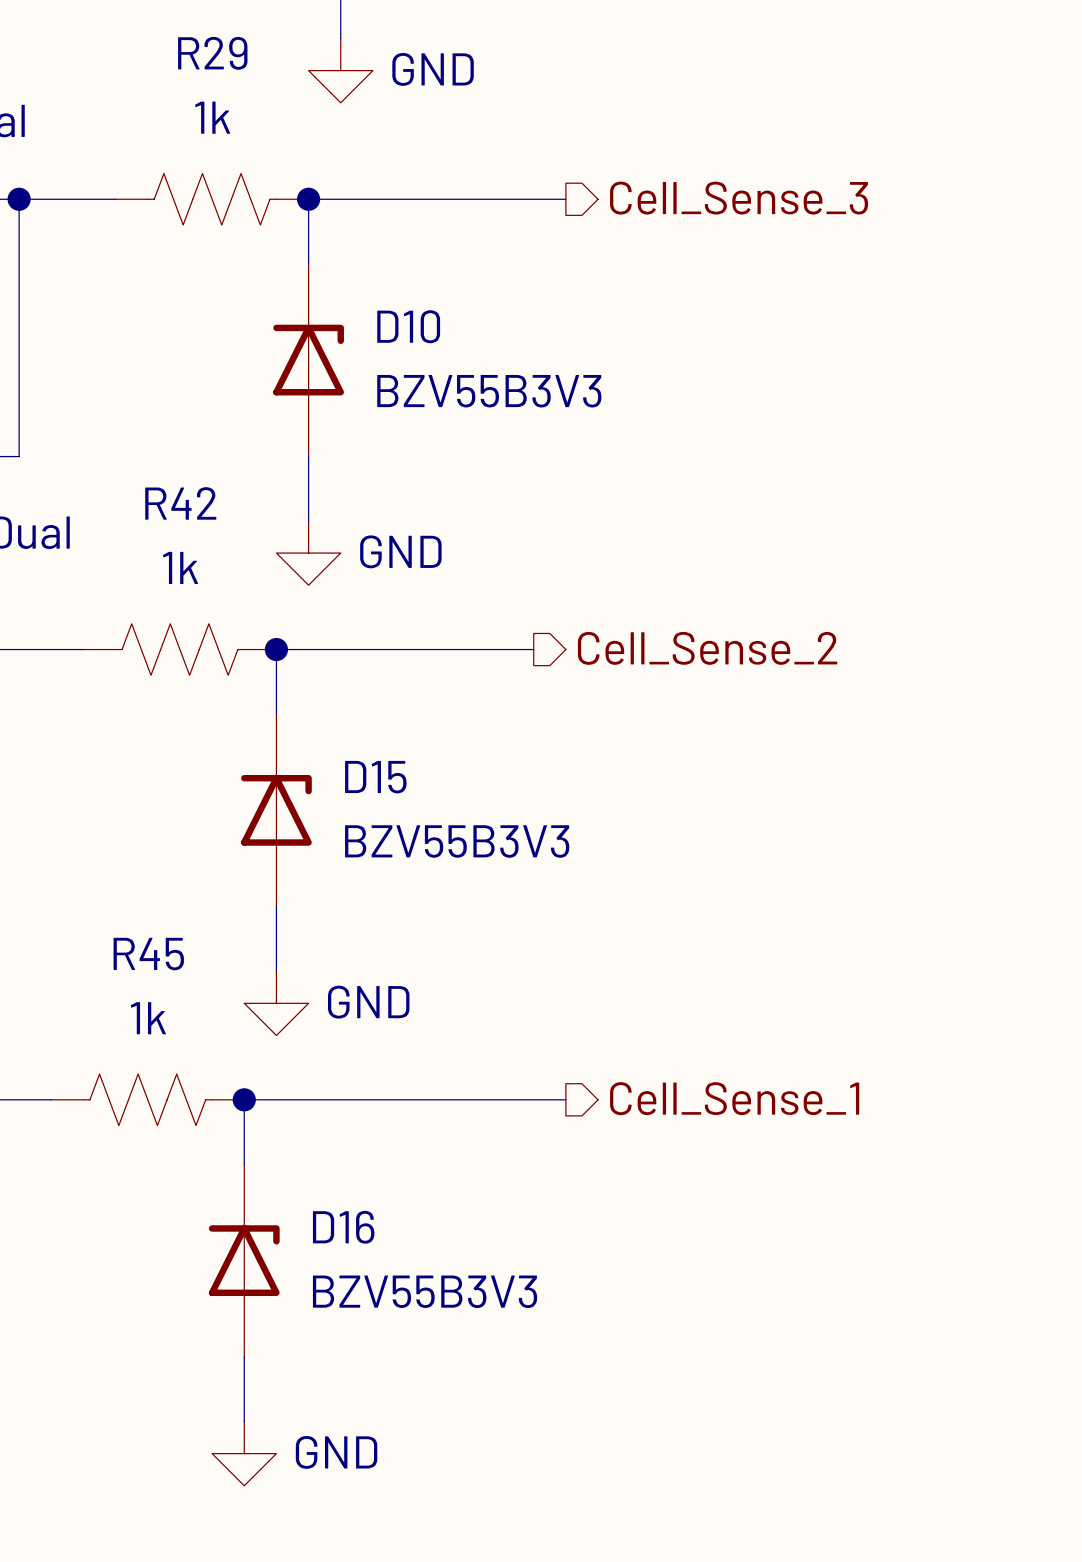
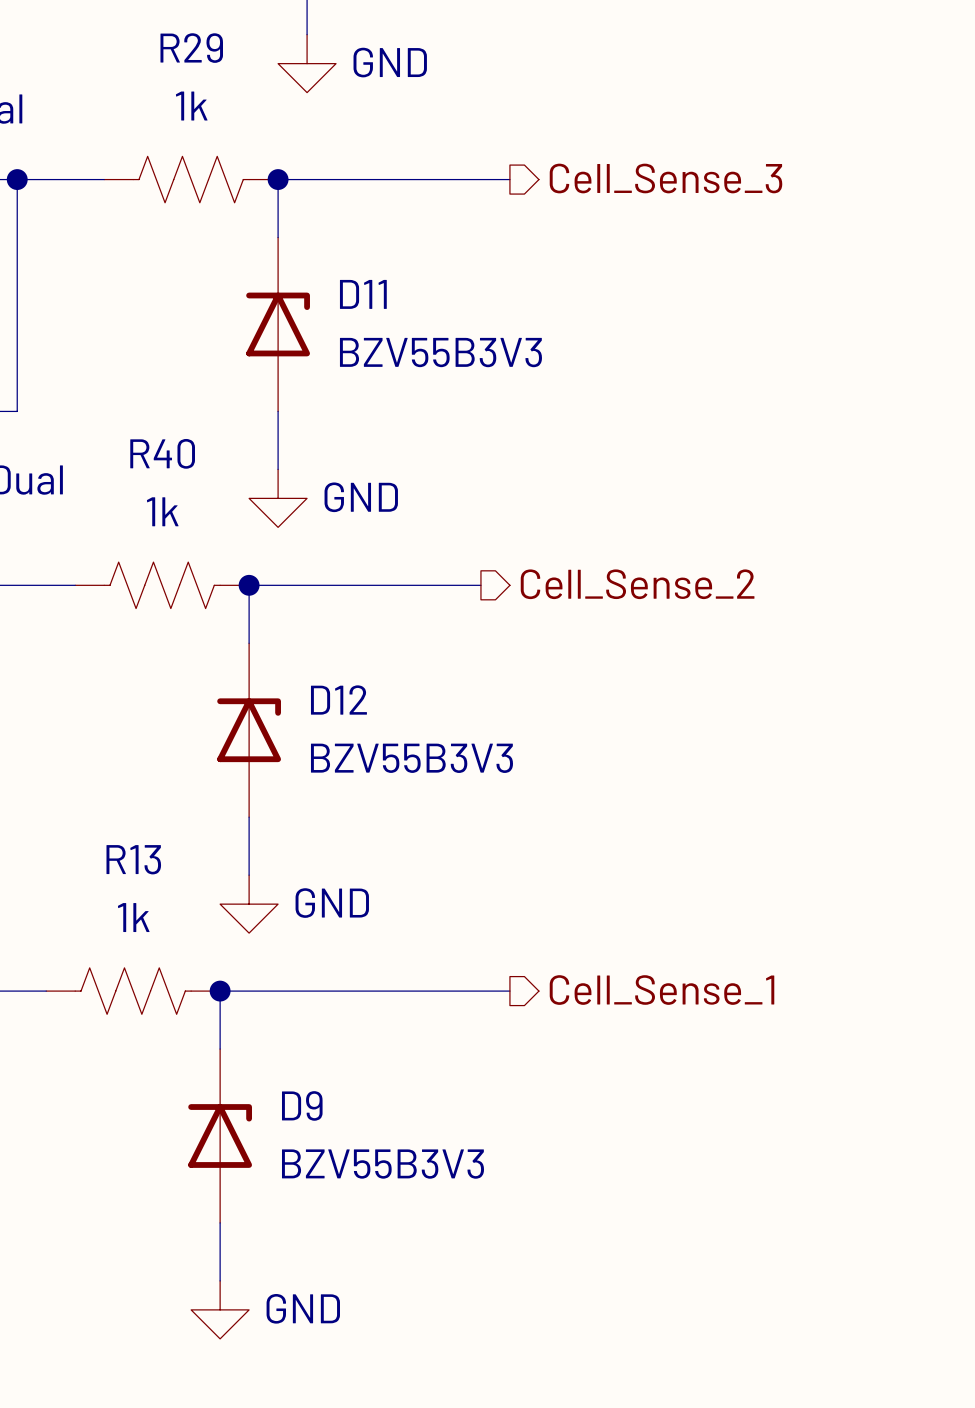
D10 name: D10 (408, 326) -> D11 (363, 294)
R42 name: R42 (180, 503) -> R40 (162, 453)
D15 name: D15 (375, 777) -> D12 (338, 700)
R45 name: R45 (148, 954) -> R13 (133, 859)
D16 name: D16 (343, 1227) -> D9 (302, 1105)

